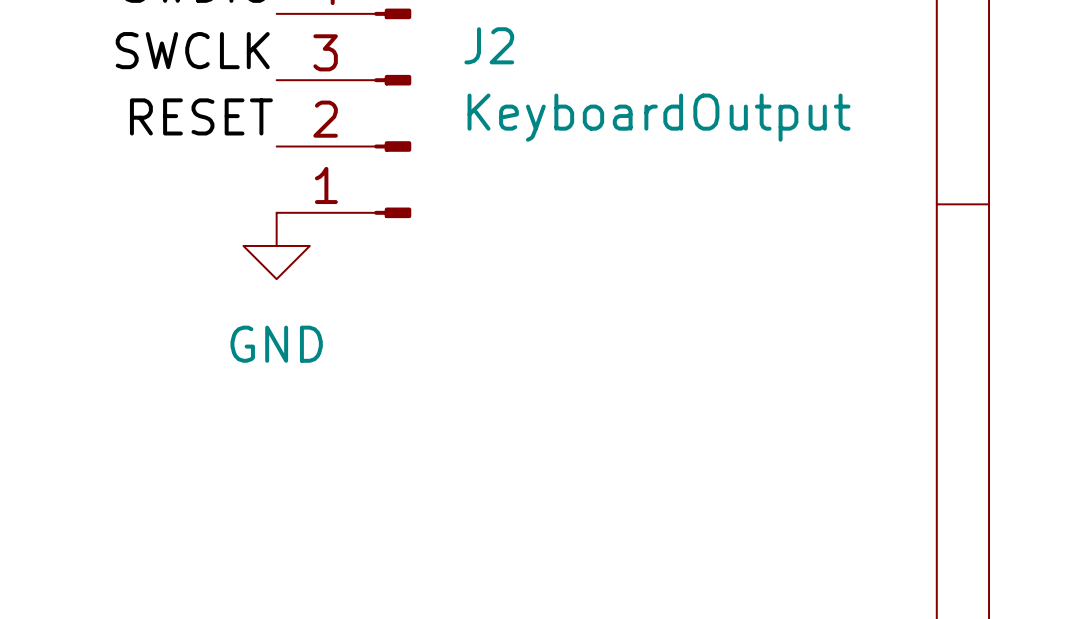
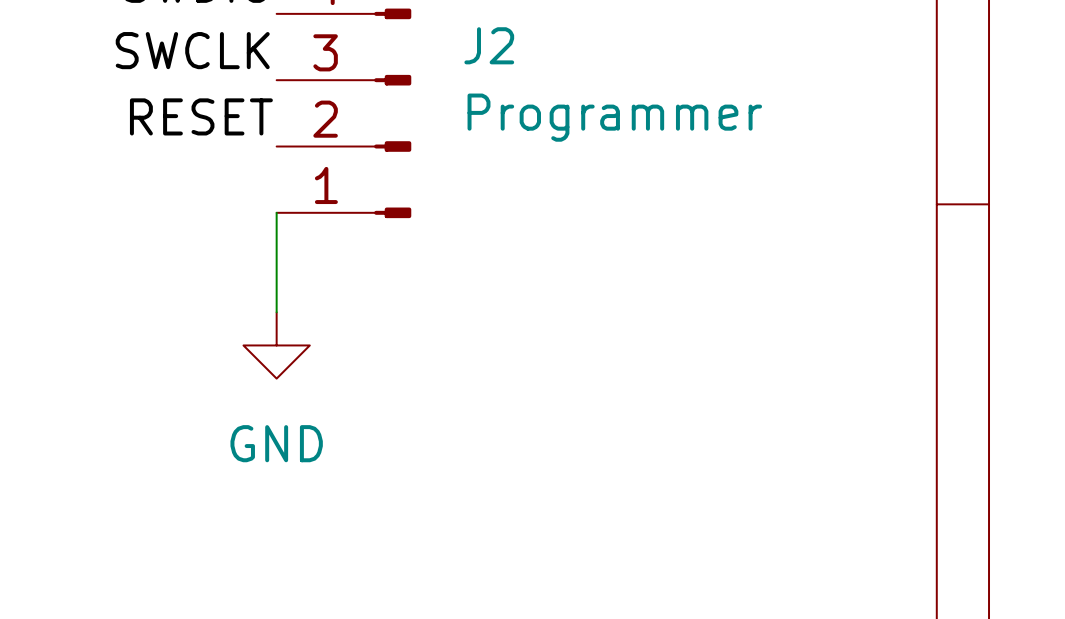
J2 value: KeyboardOutput (659, 117) -> Programmer (614, 117)
wire: none -> (276, 212) (276, 312)
power symbol position: GND (276, 245) -> GND (276, 345)

